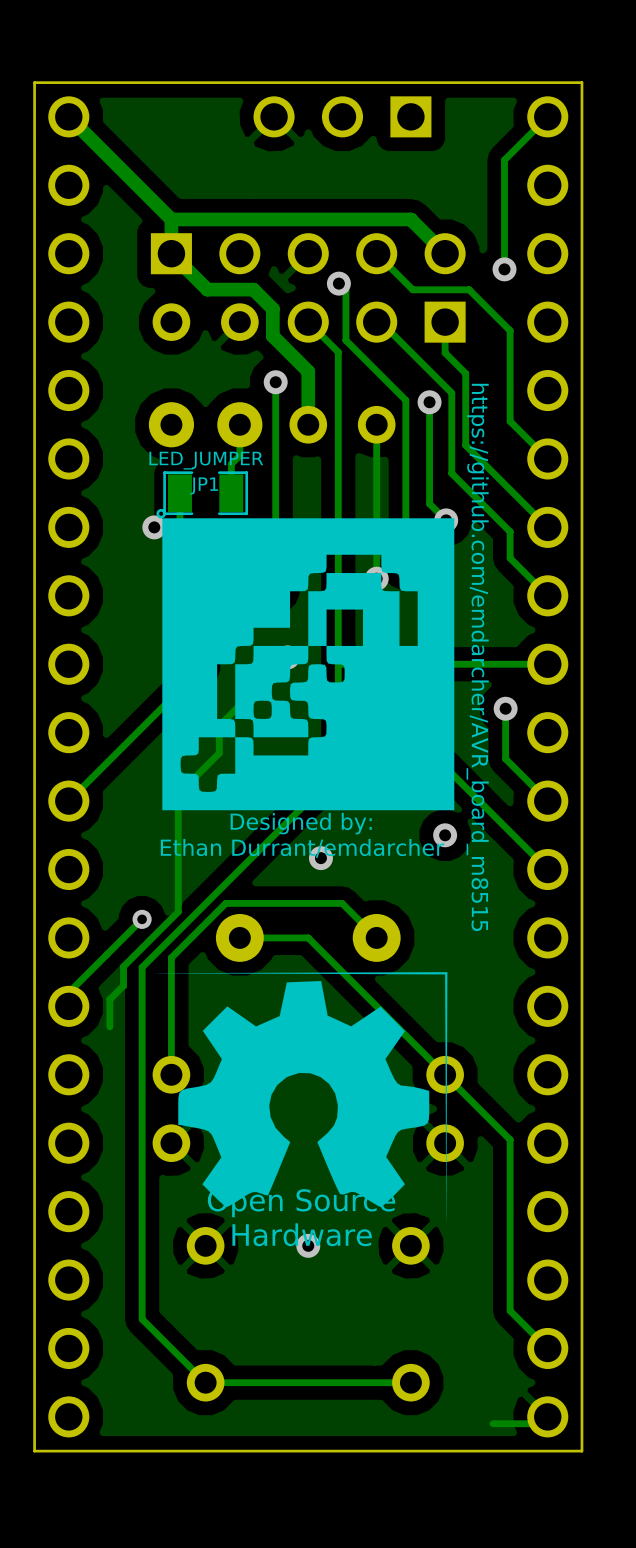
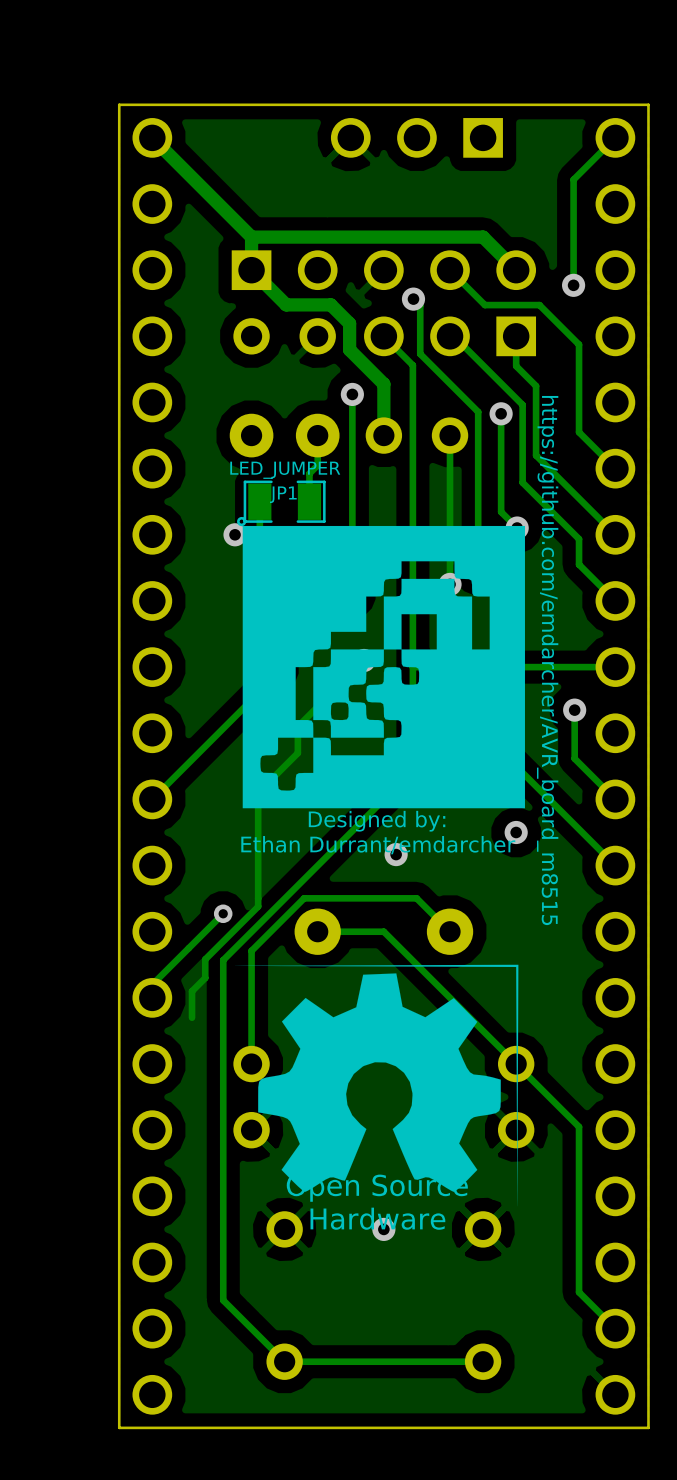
track: (547, 1416) (540, 1423) (493, 1423) -> none

